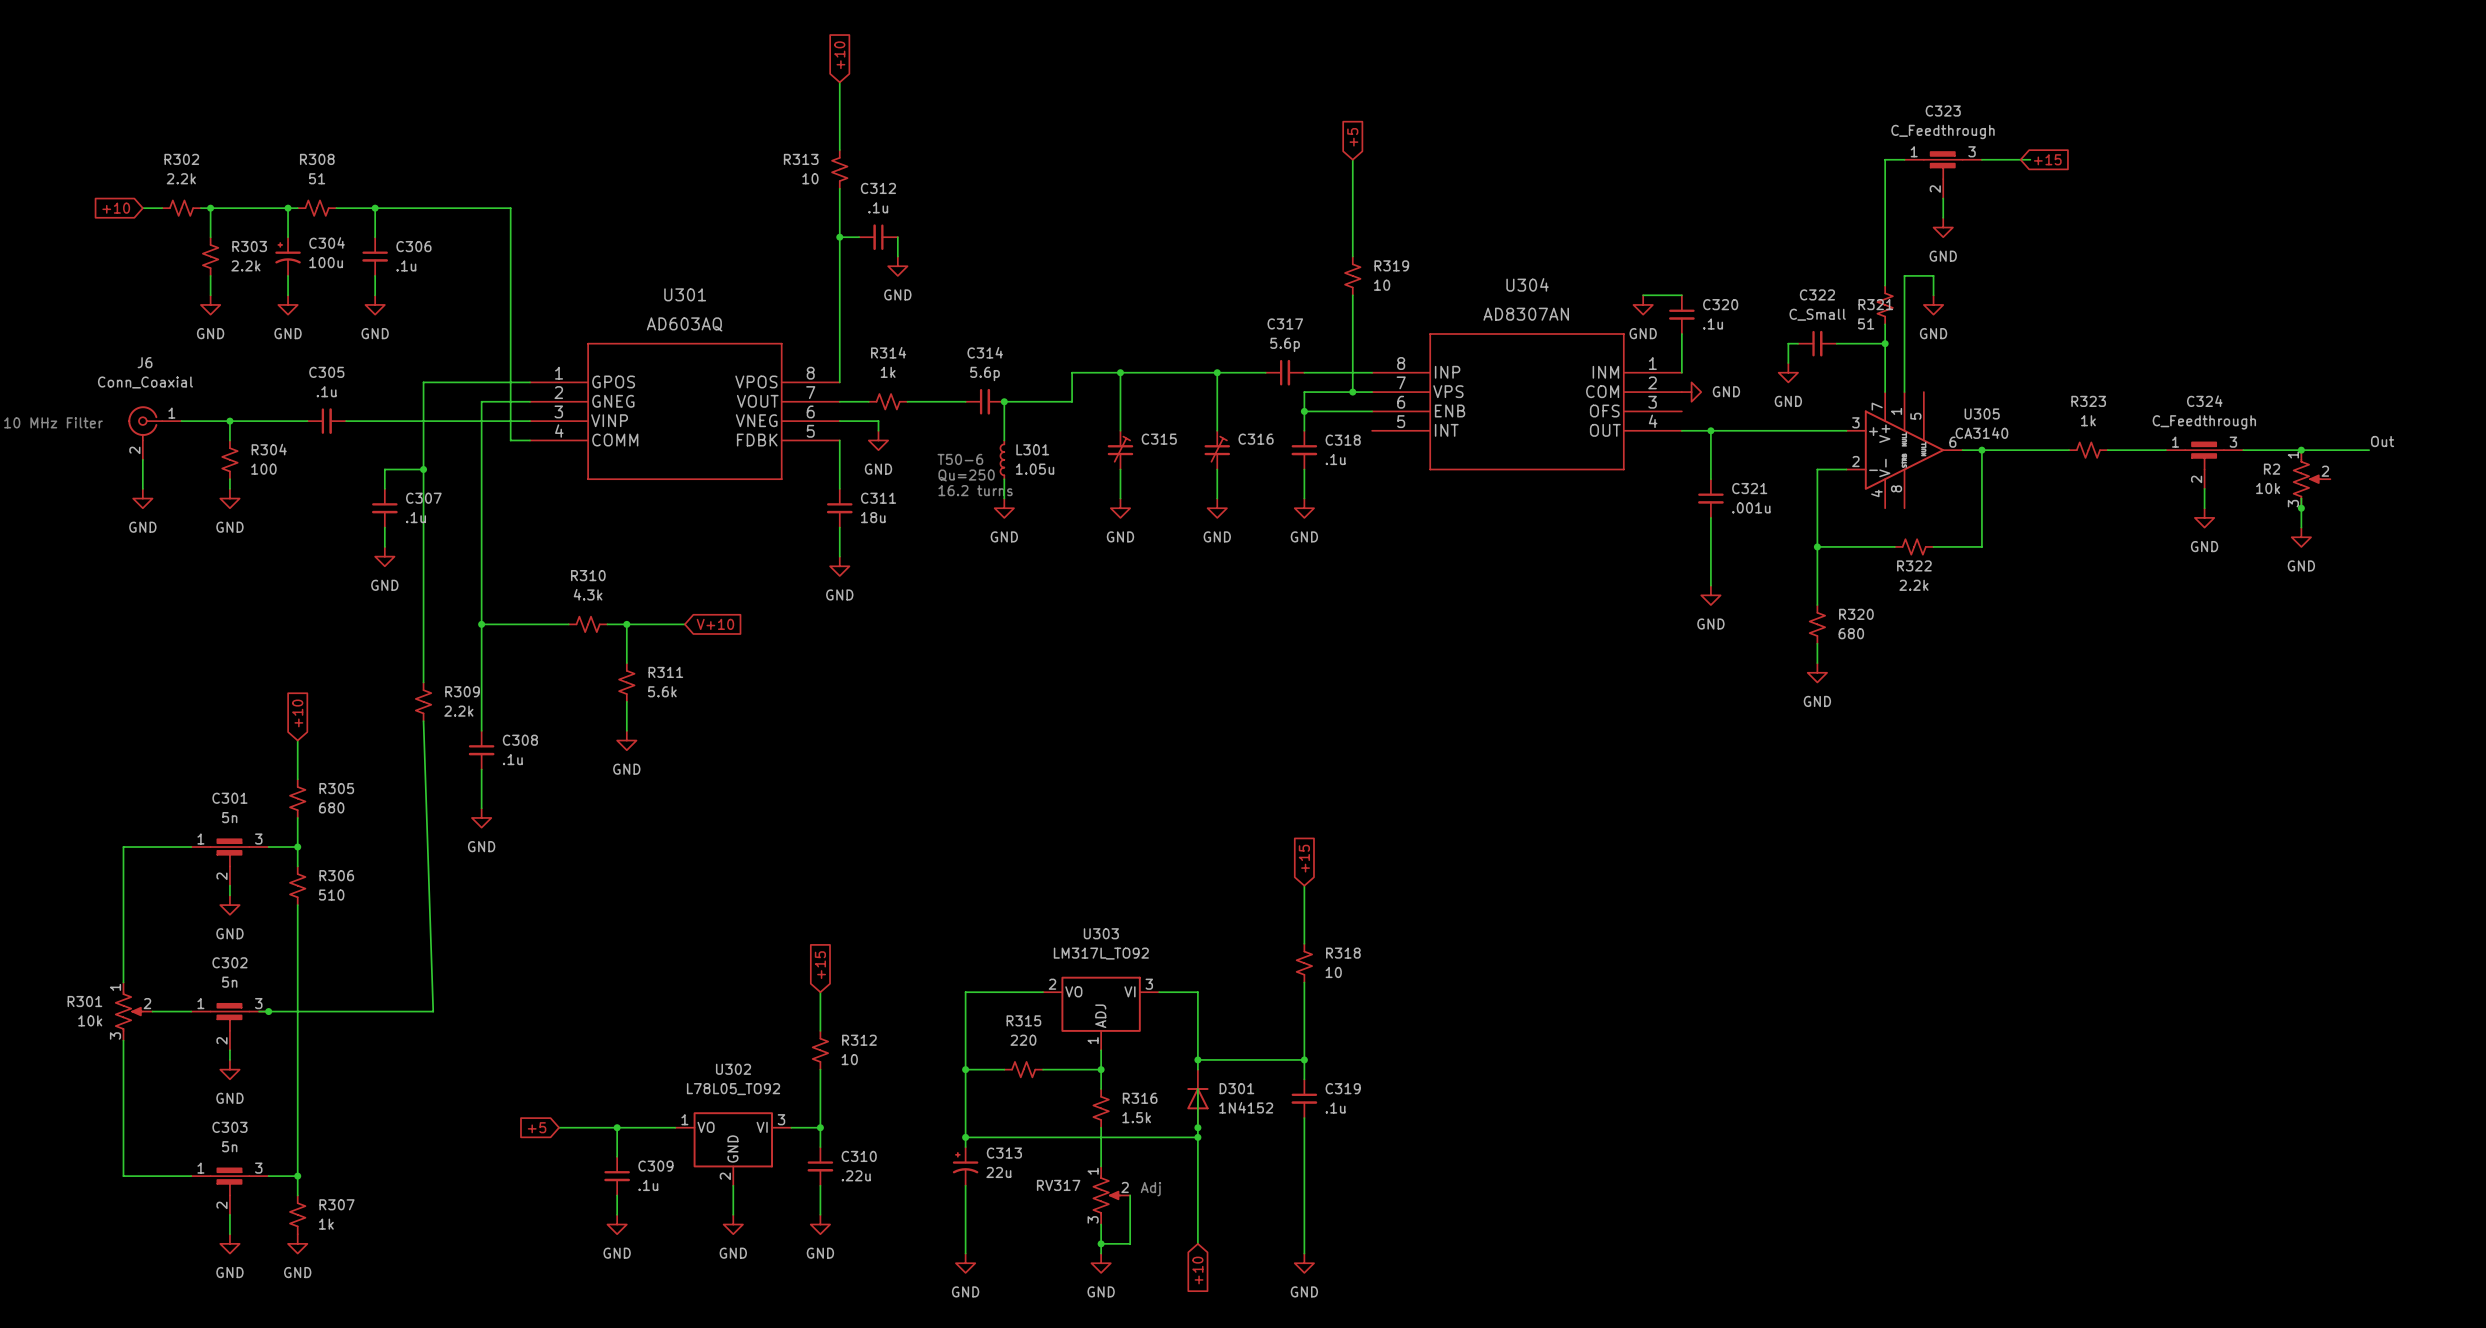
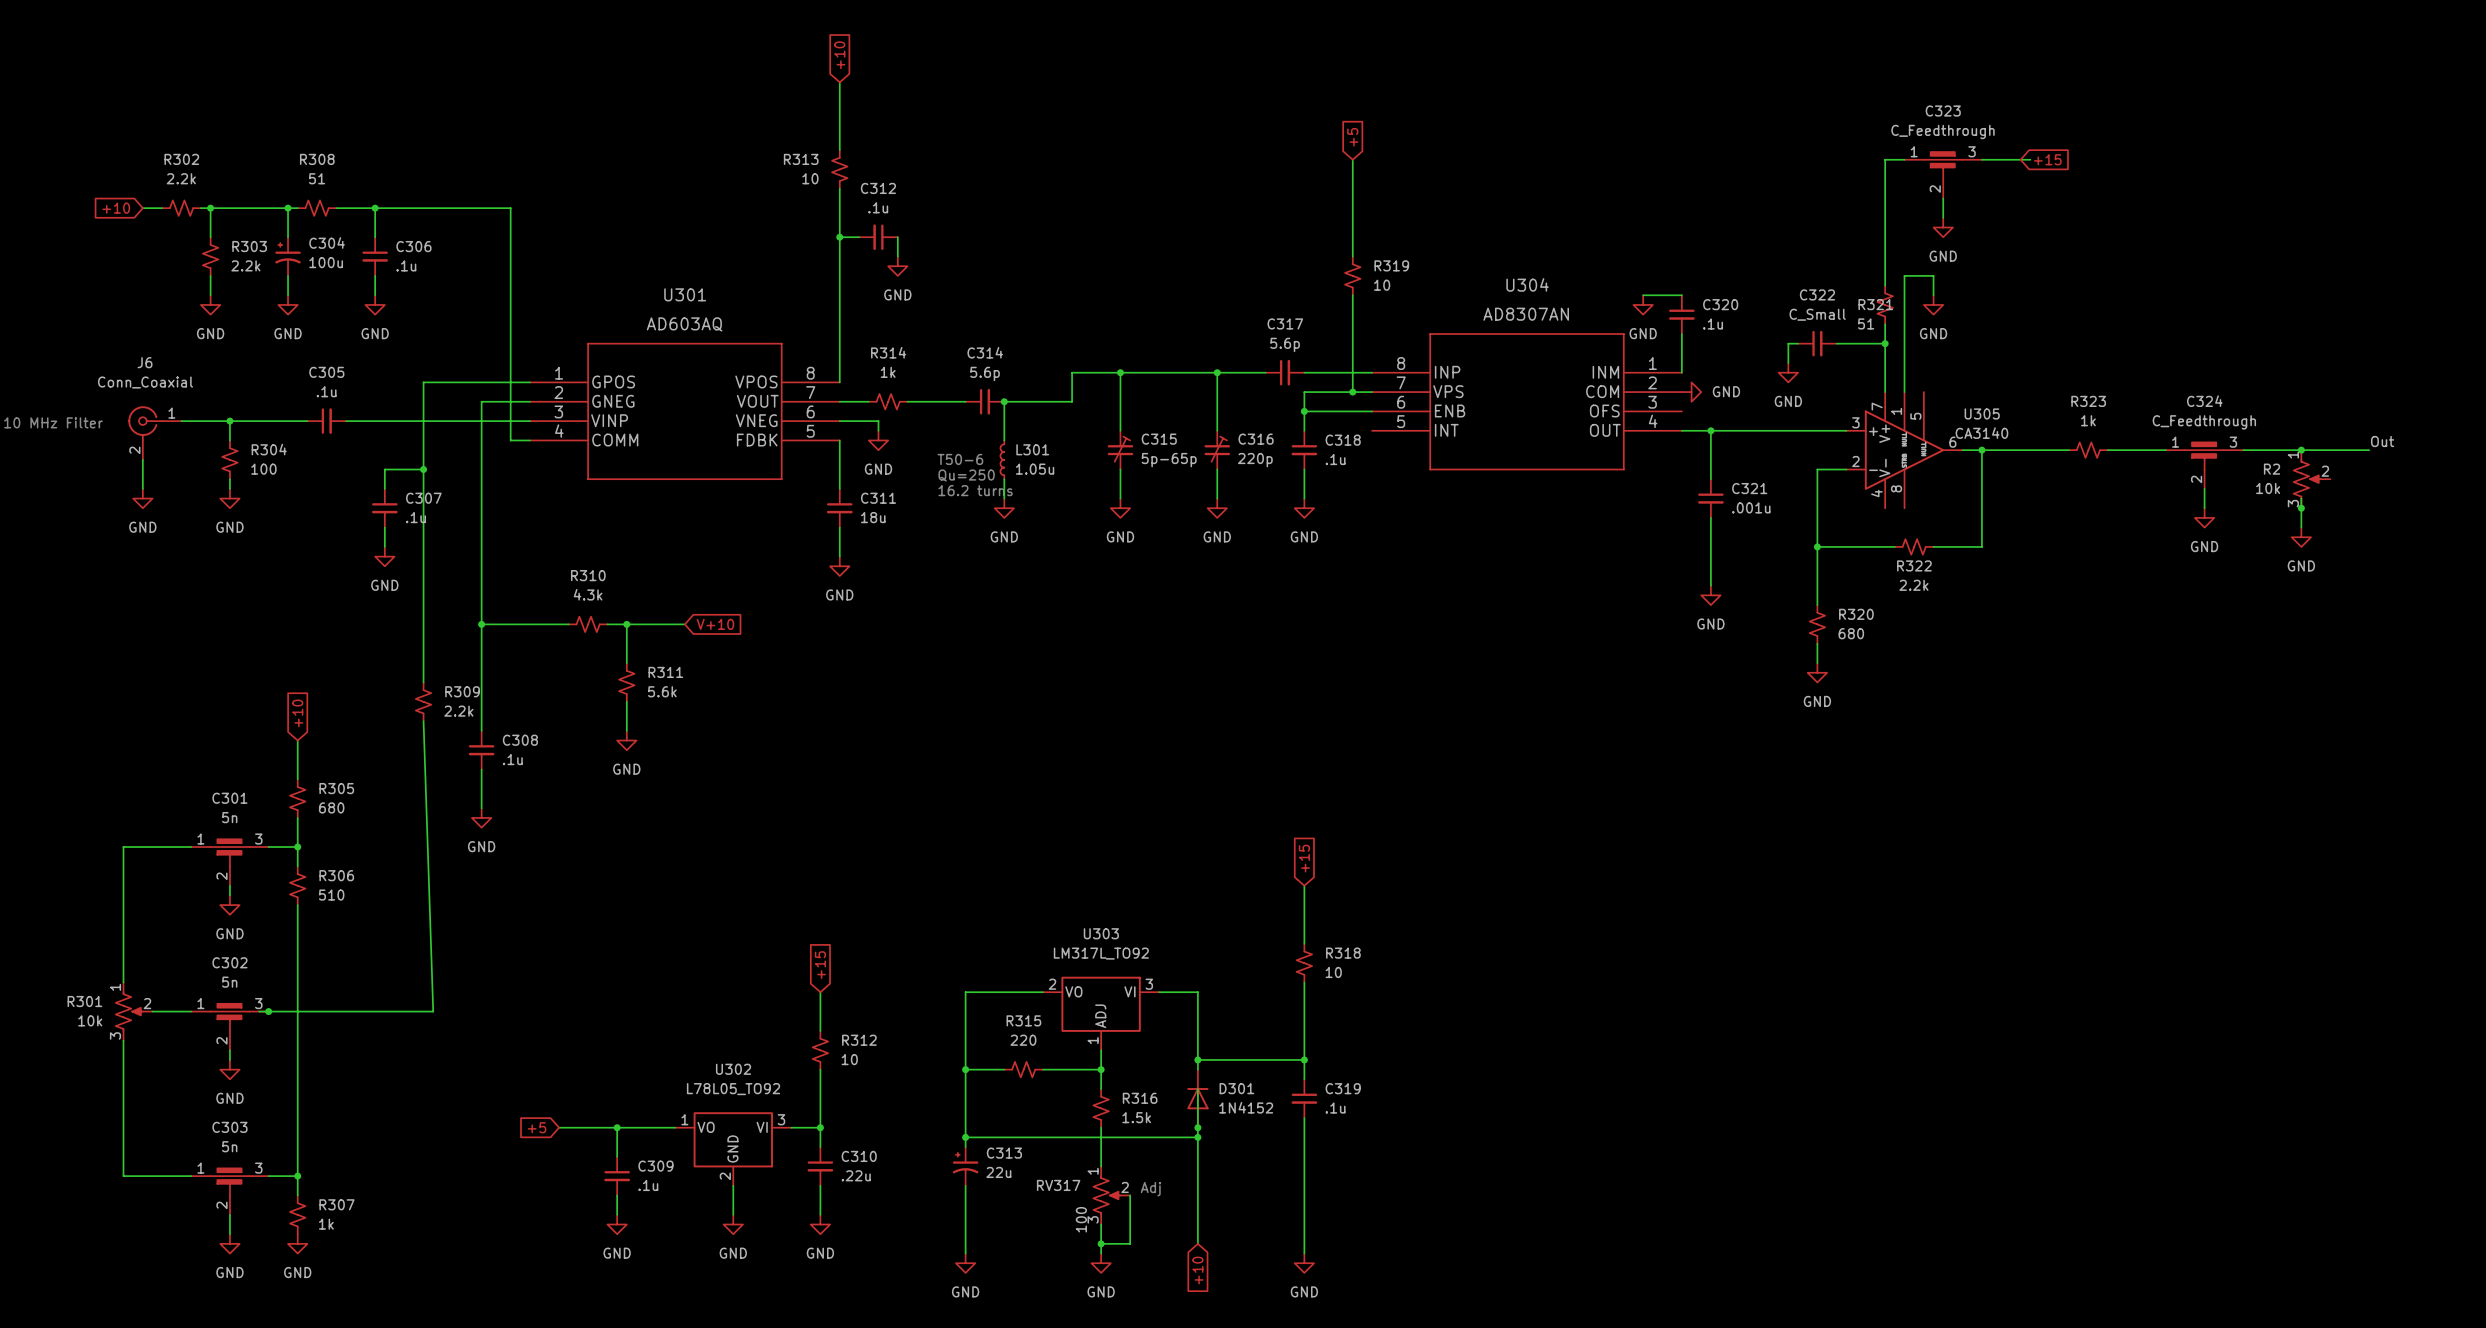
C315 value: none -> 5p-65p (1169, 460)
C316 value: none -> 220p (1255, 460)
RV317 value: none -> 100 (1081, 1219)

